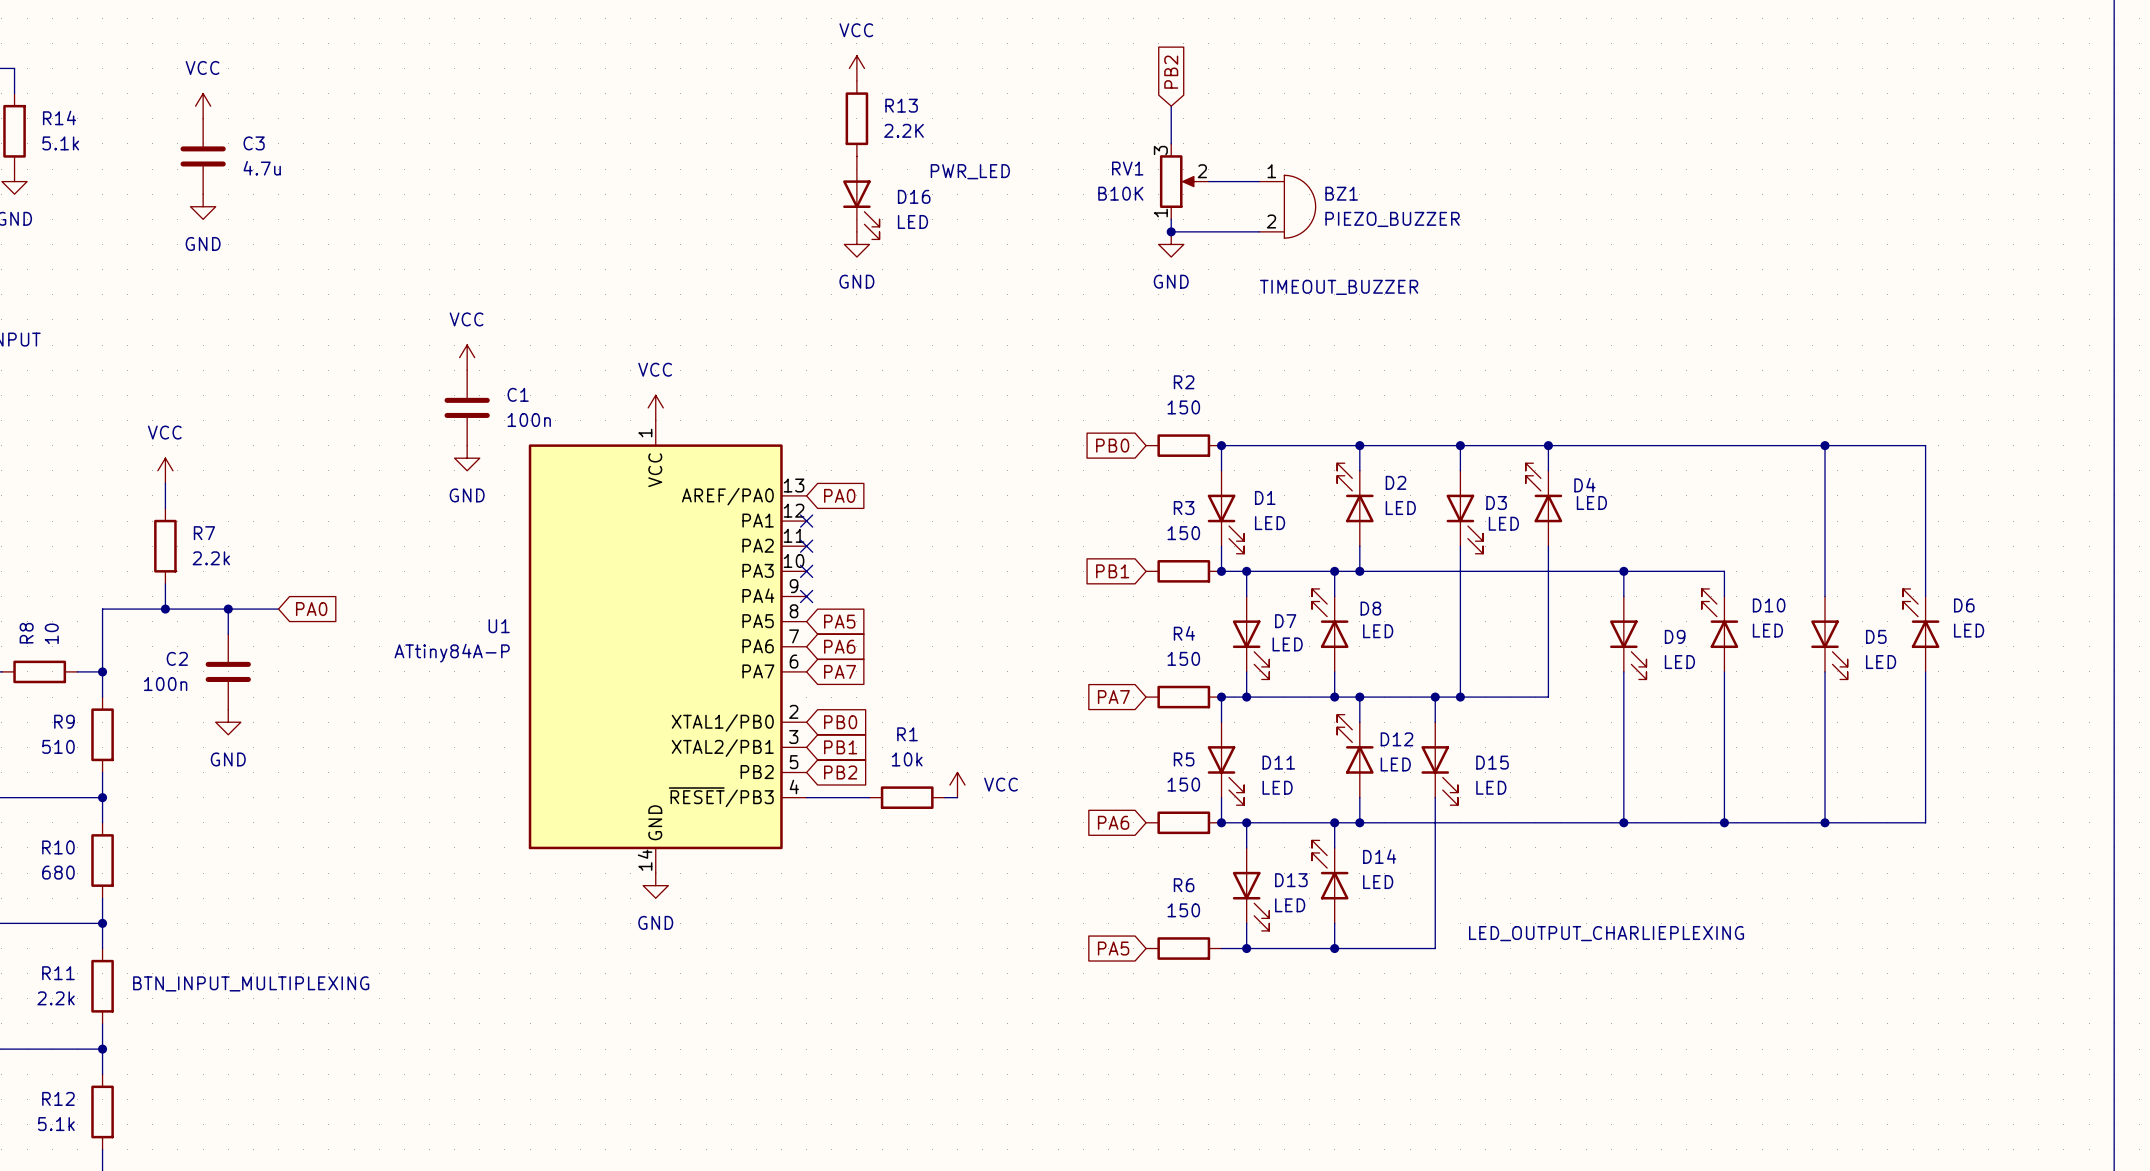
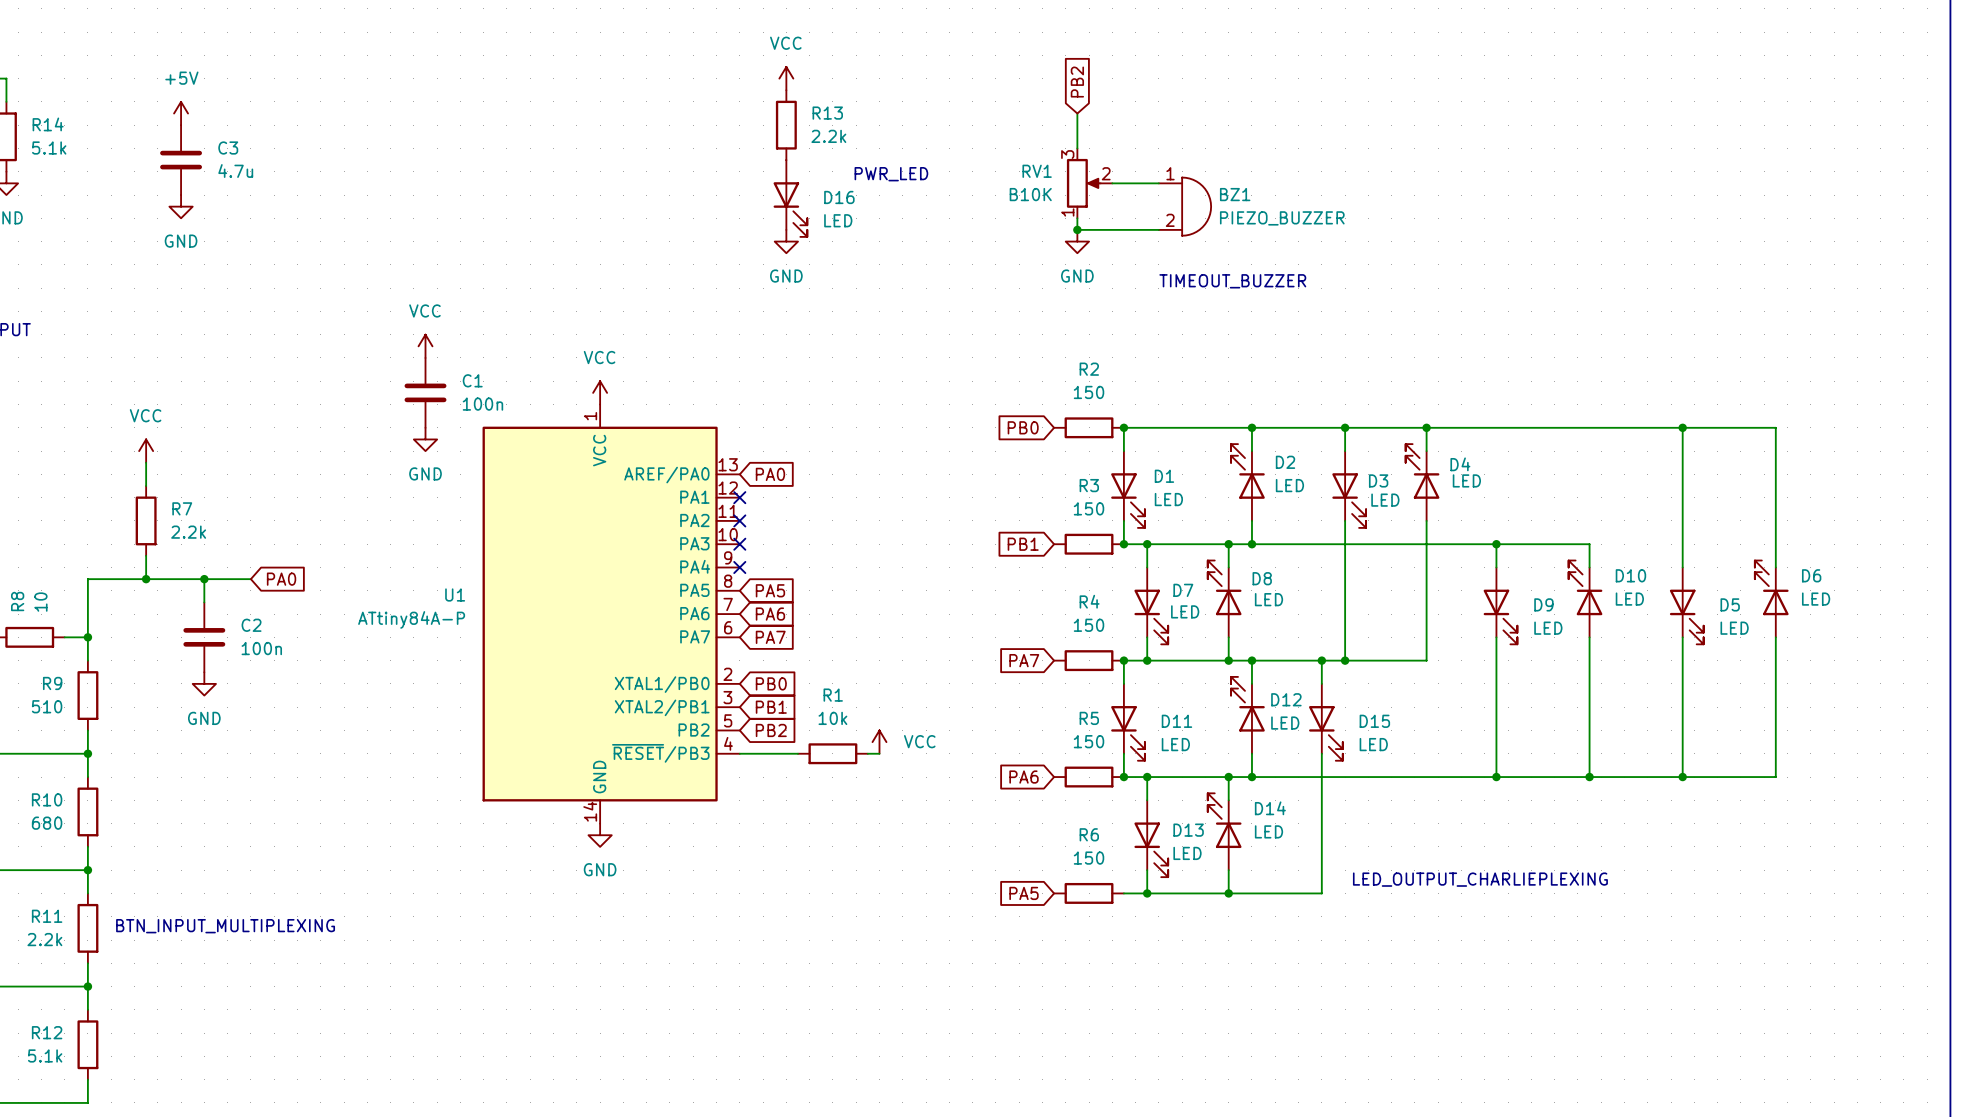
power symbol: VCC (203, 106) -> +5V (181, 113)
R13 value: 2.2K (904, 130) -> 2.2k (828, 136)
C2 name position: C2 (177, 658) -> C2 (251, 625)
C2 value position: 100n (165, 684) -> 100n (261, 648)

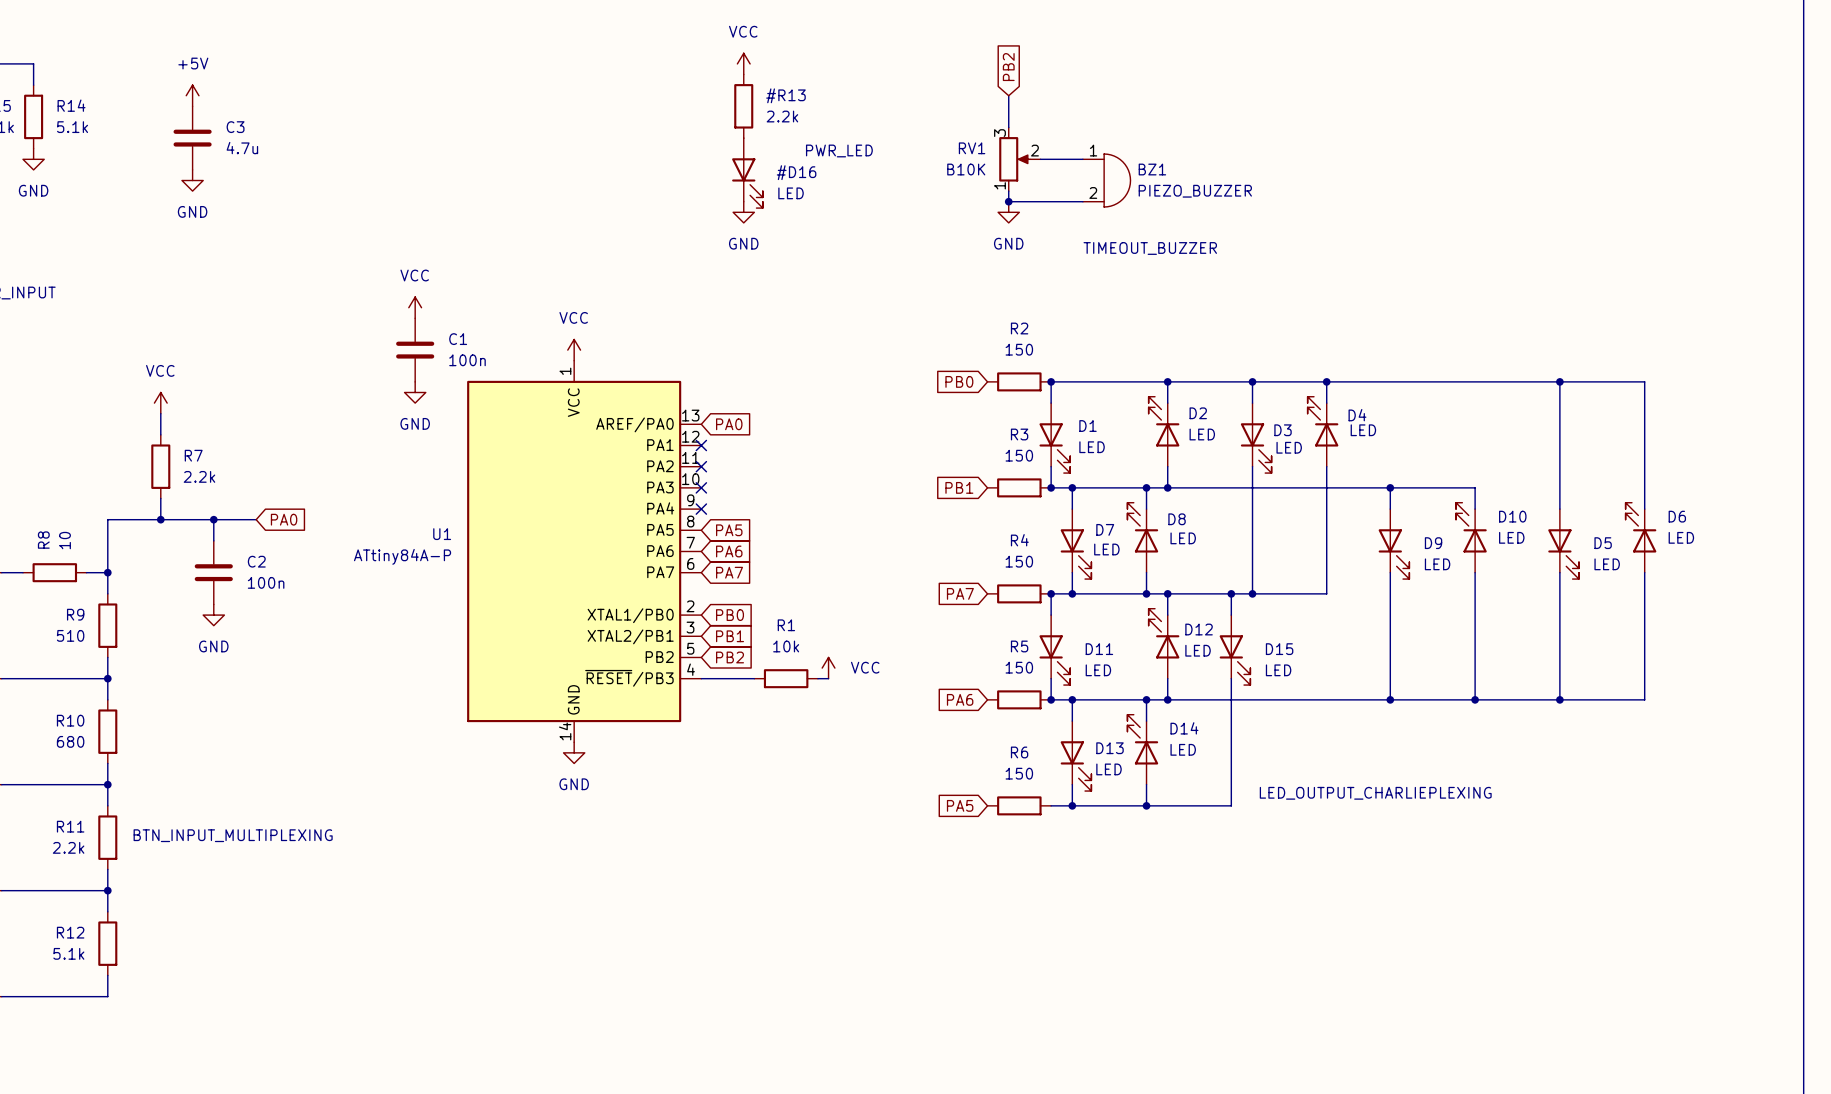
R13: 2.2k (786, 125) -> none
#R13: none -> 2.2k (743, 106)
D16: LED (790, 198) -> none
#D16: none -> LED (747, 173)

